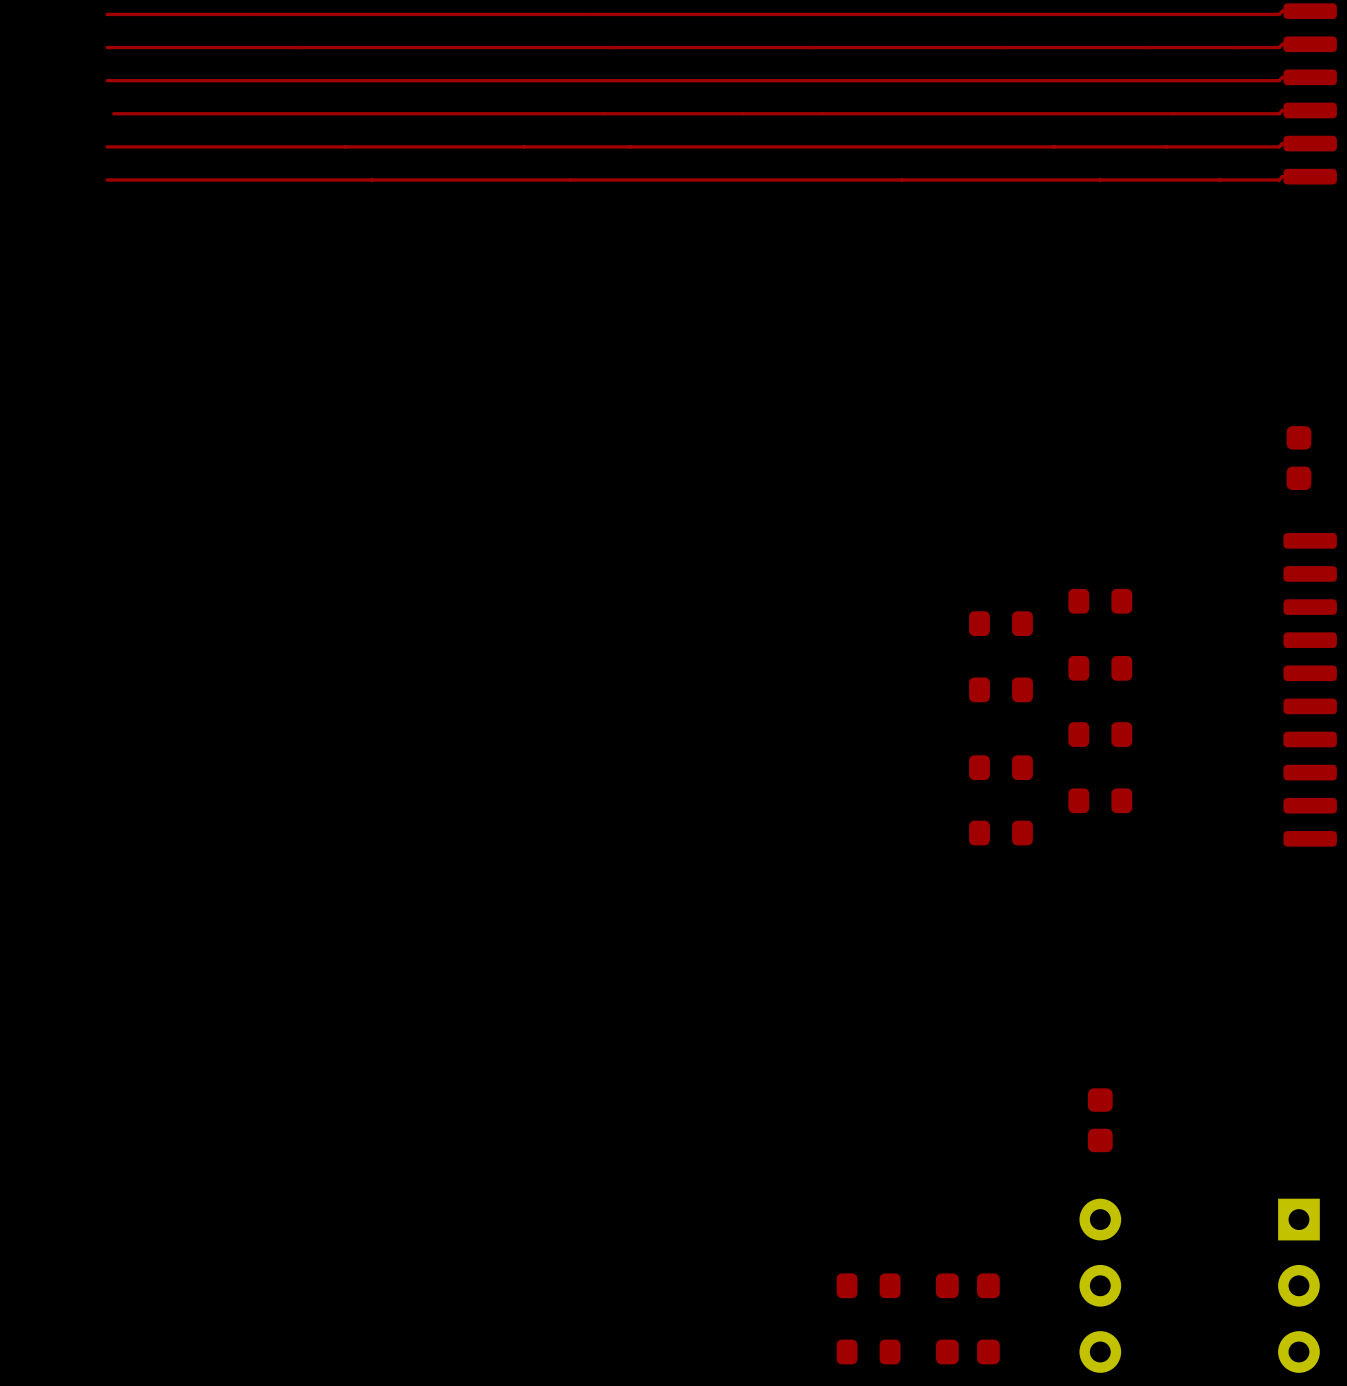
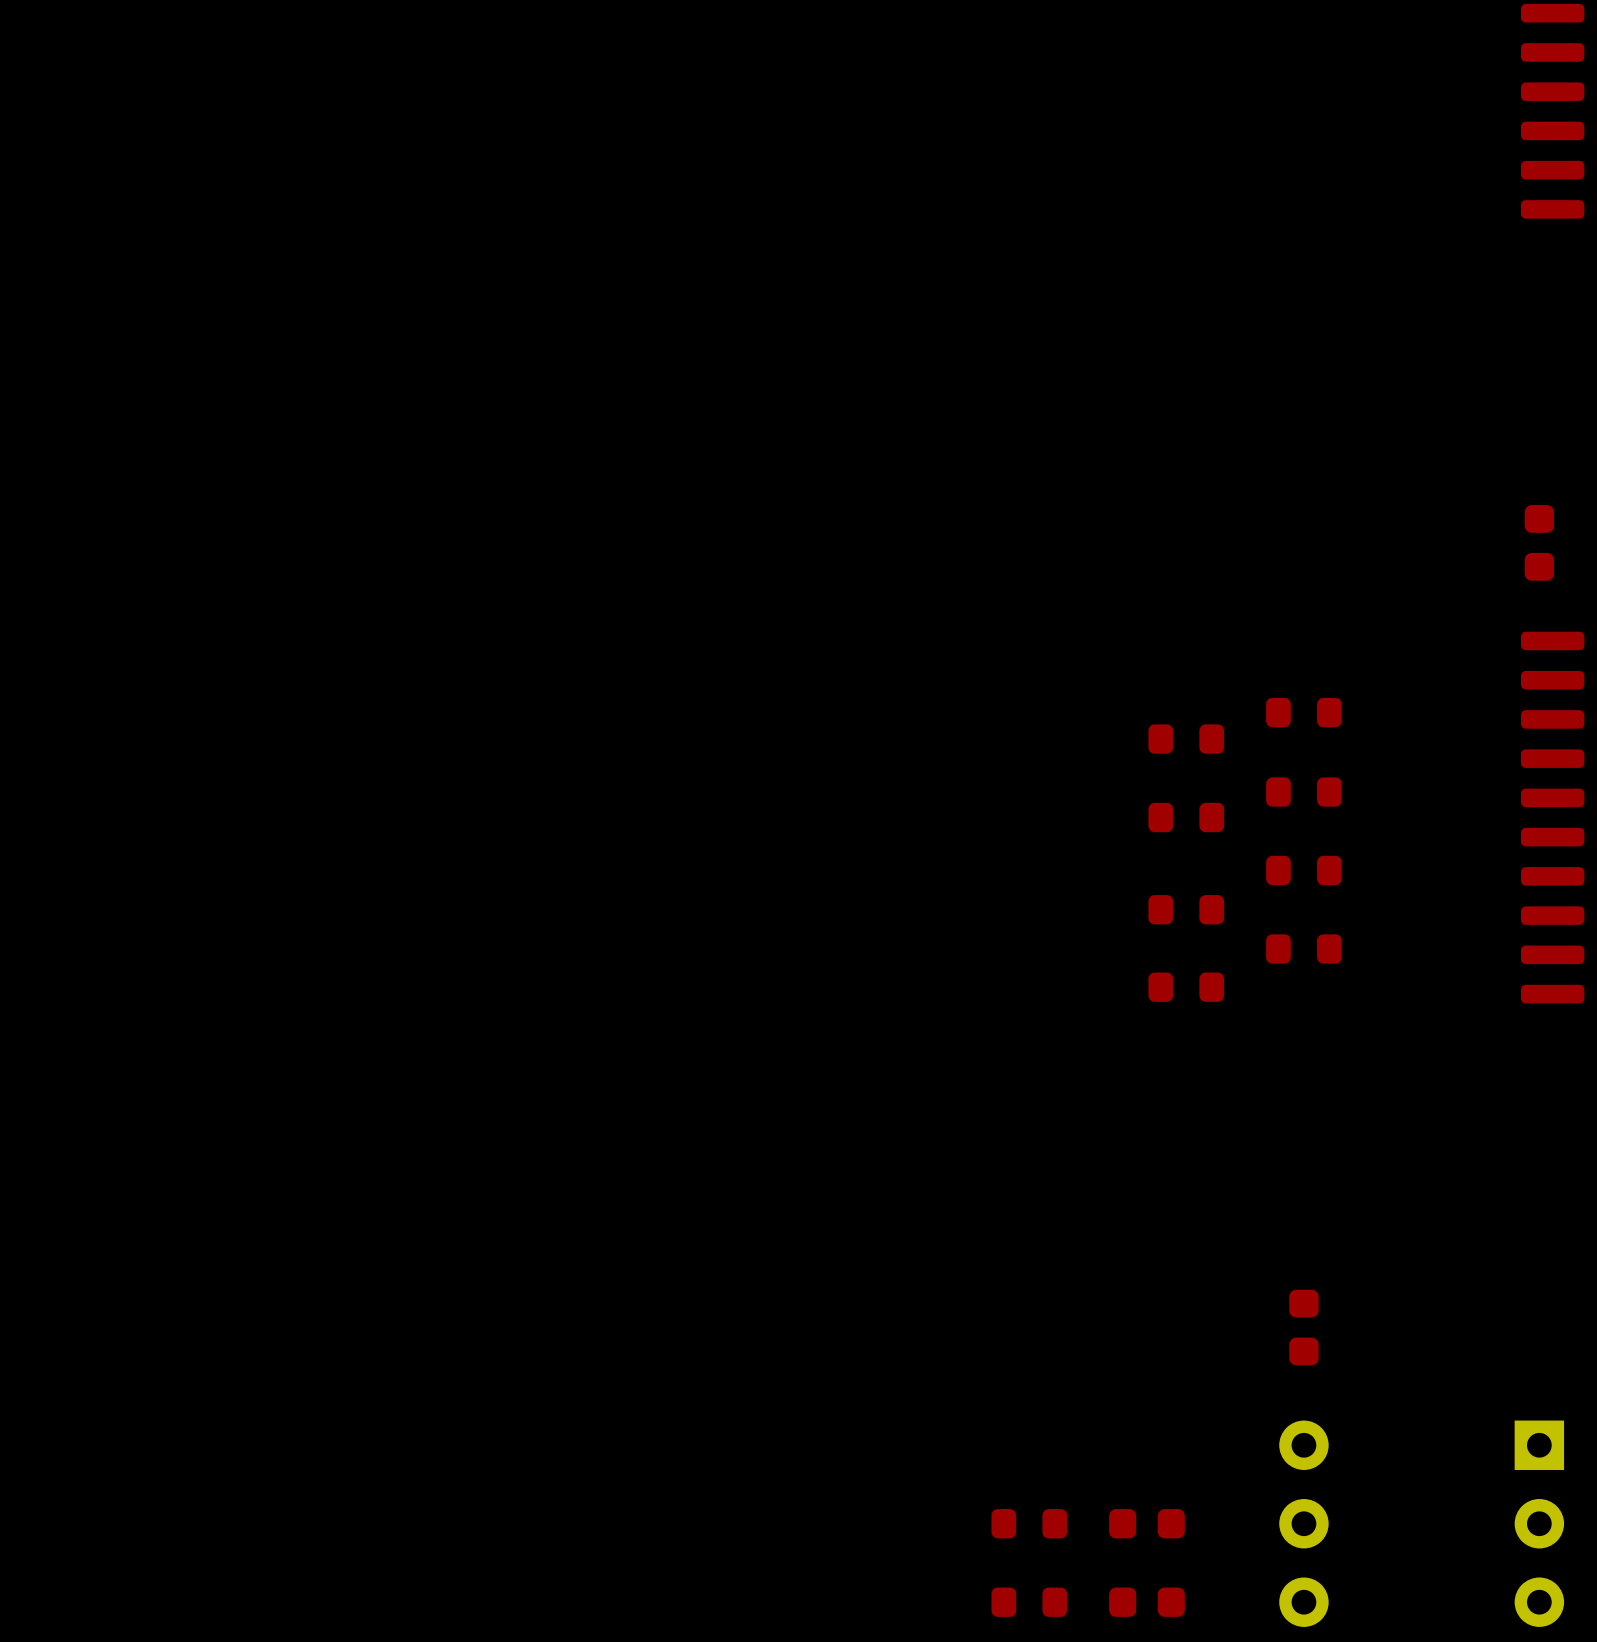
top track: (1310, 11) (1282, 11) (1279, 14) (107, 14) -> none
top track: (1310, 44) (1282, 44) (1279, 47) (107, 47) -> none
top track: (1310, 77) (1282, 77) (1279, 80) (107, 80) -> none
top track: (1310, 110) (1282, 110) (1279, 113) (113, 113) -> none
top track: (1310, 143) (1282, 143) (1279, 146) (107, 146) -> none
top track: (1310, 176) (1282, 176) (1279, 179) (107, 179) -> none

